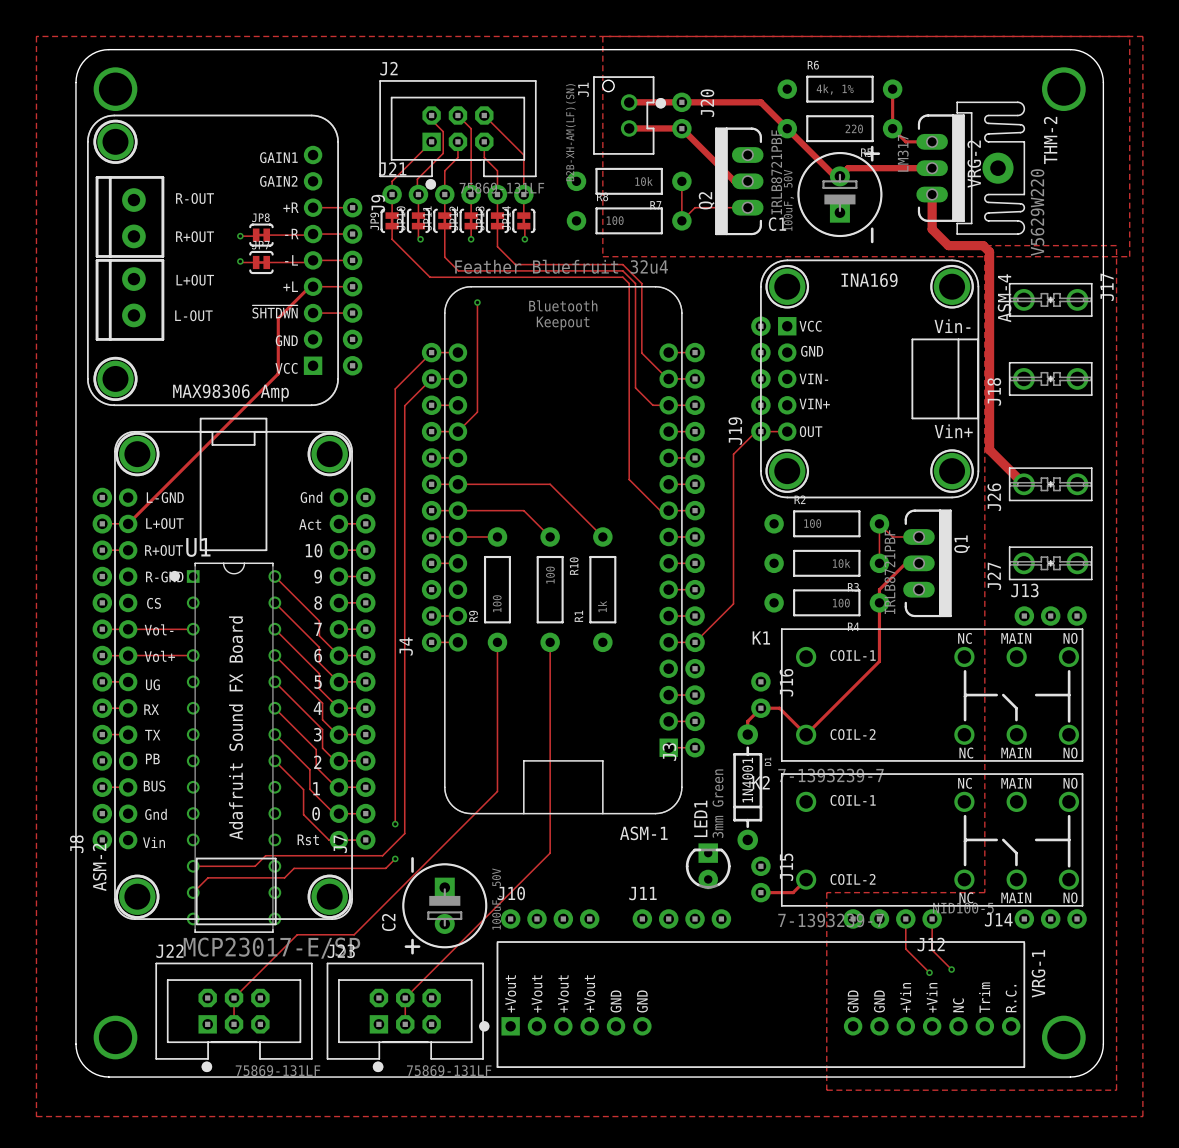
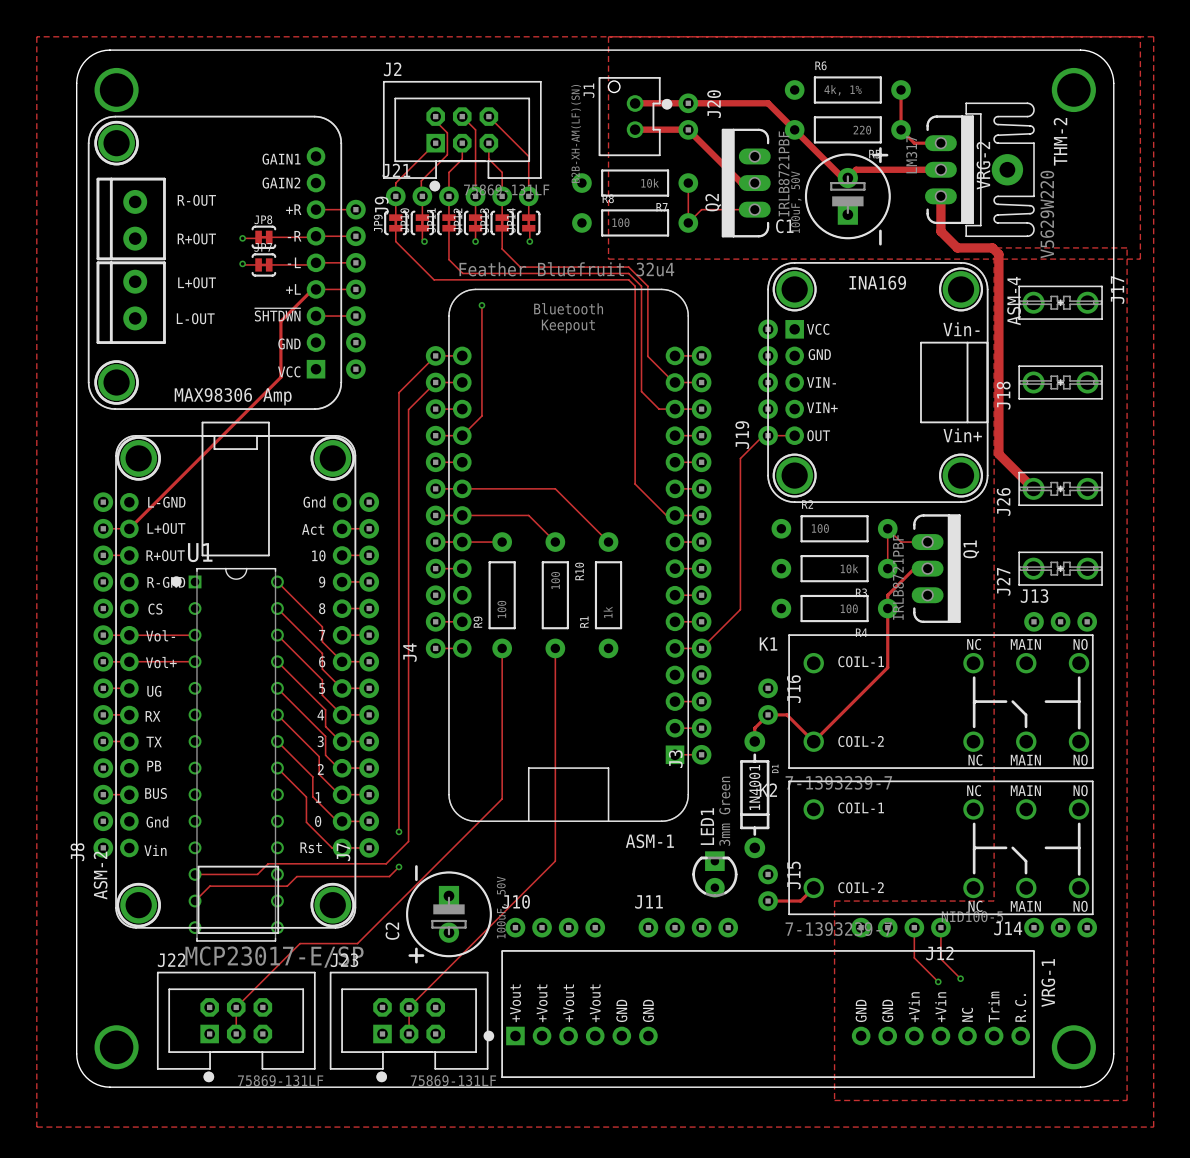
ASM-2 footprint: [114, 417, 353, 926] -> [115, 421, 357, 934]

